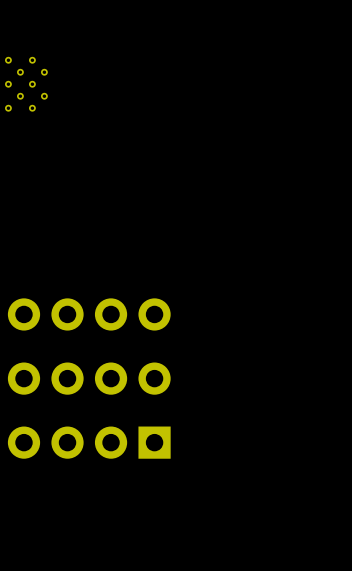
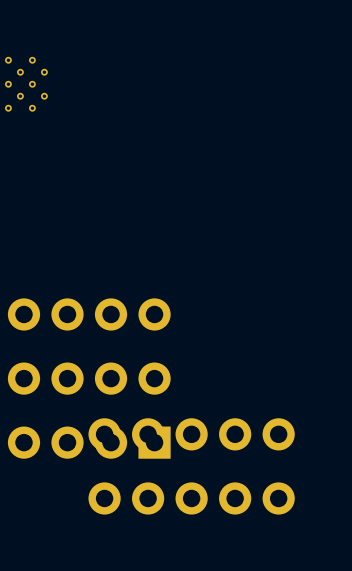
part: none -> (191, 434)
part: none -> (191, 498)

